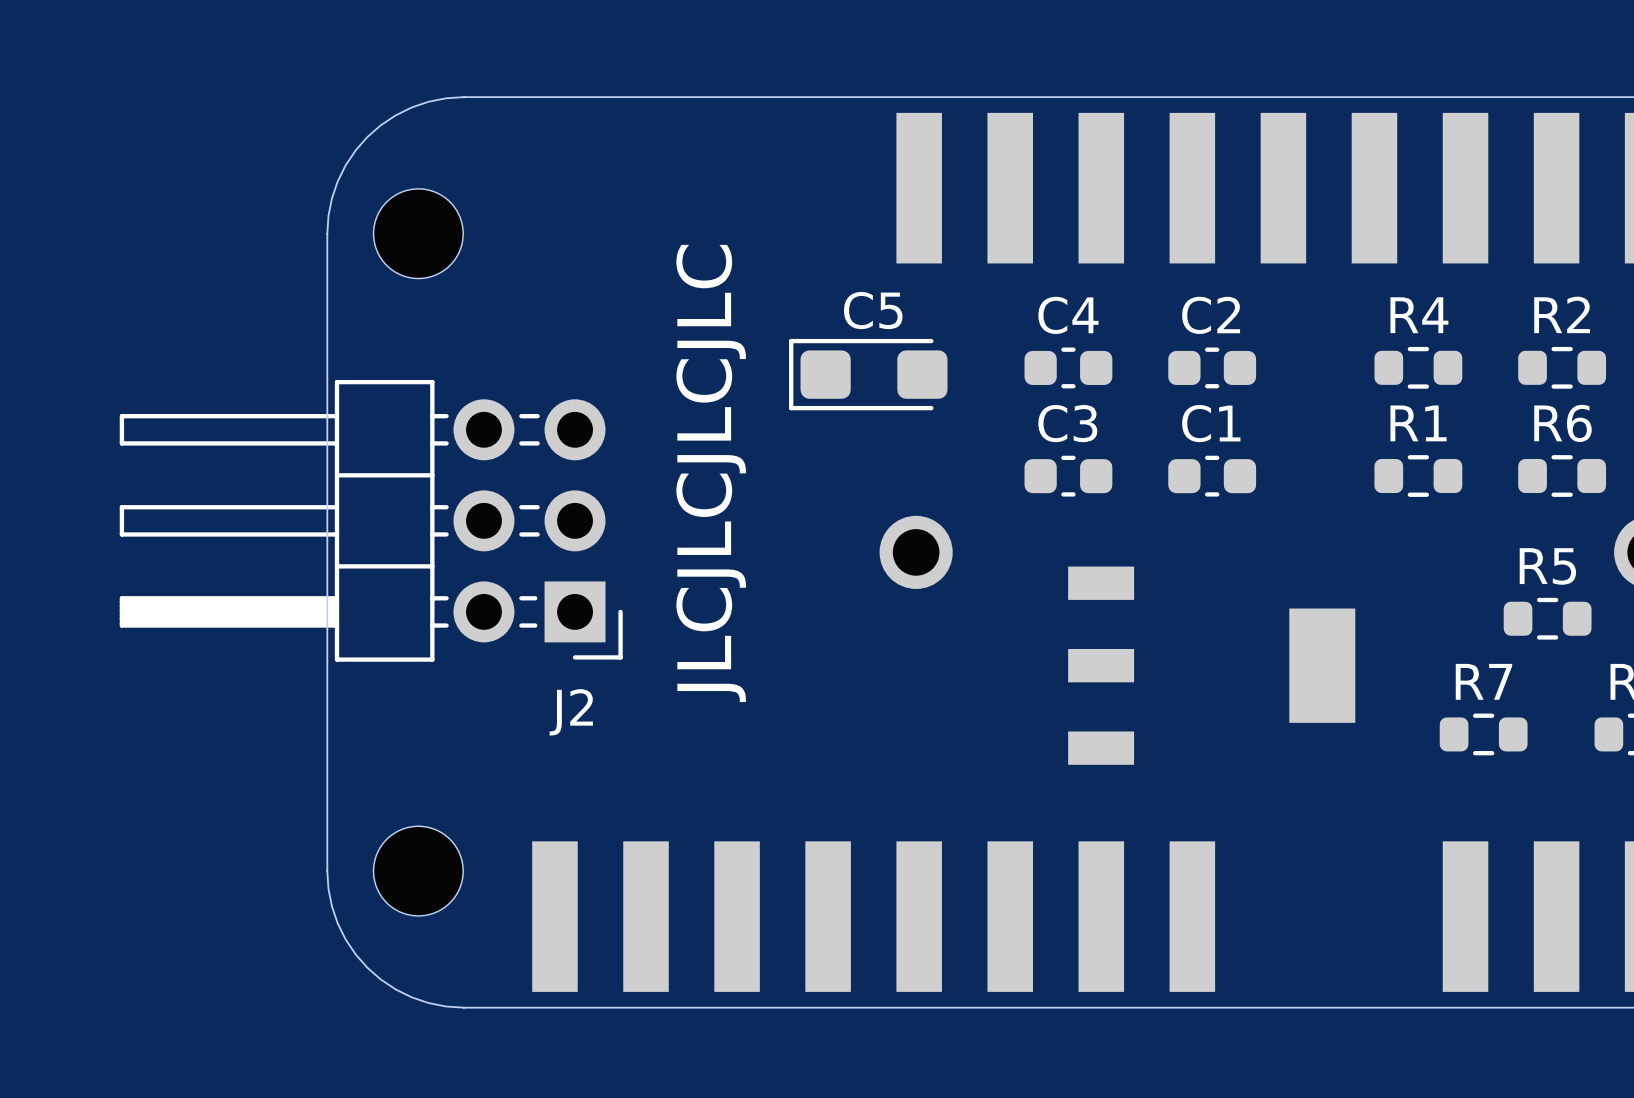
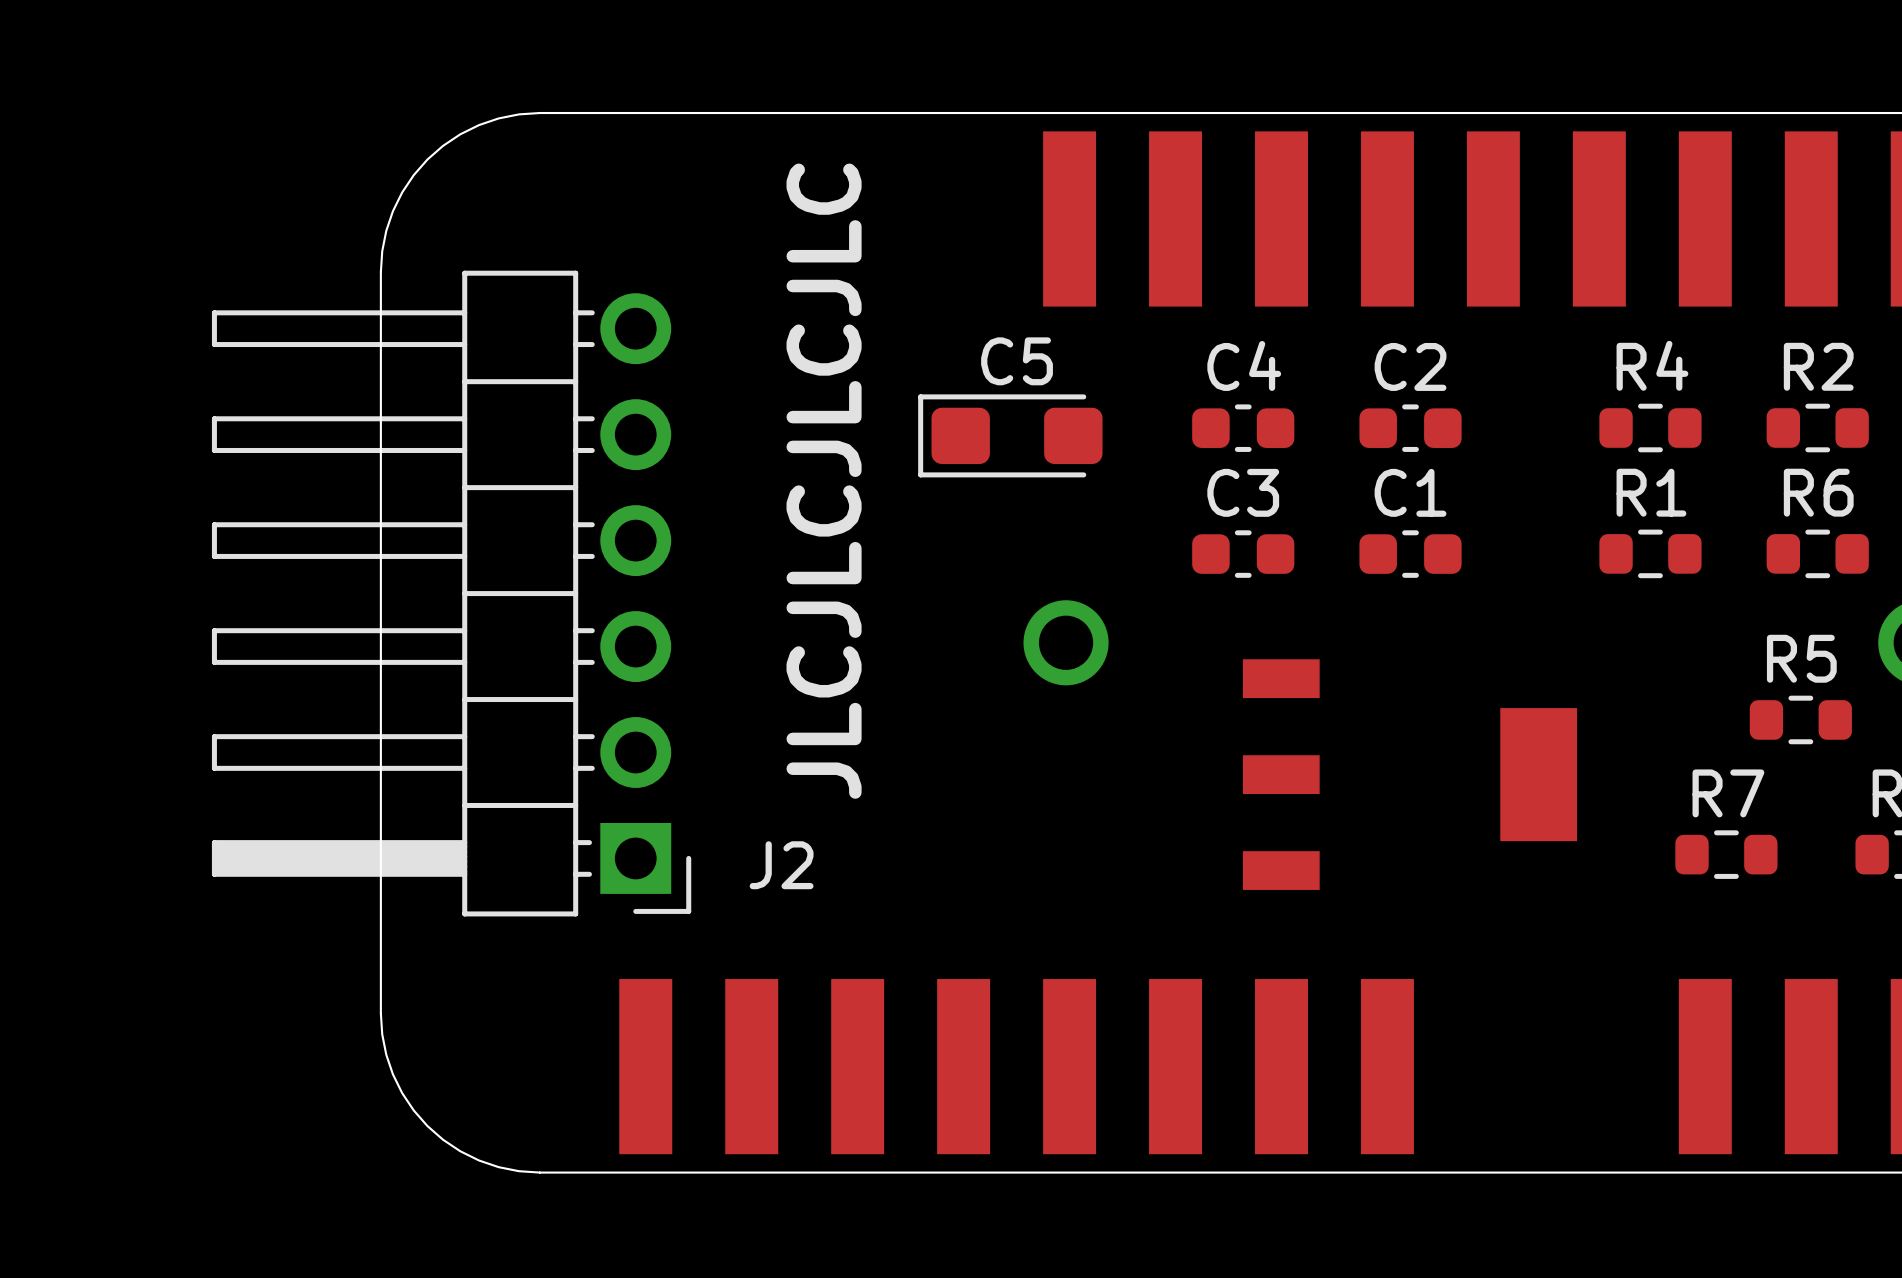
part: (418, 233) -> none
J2 footprint: [119, 379, 623, 662] -> [211, 270, 692, 917]
text position: JLCJLCJLCJLC (711, 473) -> JLCJLCJLCJLC (824, 481)
J2 name position: J2 (571, 712) -> J2 (781, 865)
part: (418, 871) -> none

